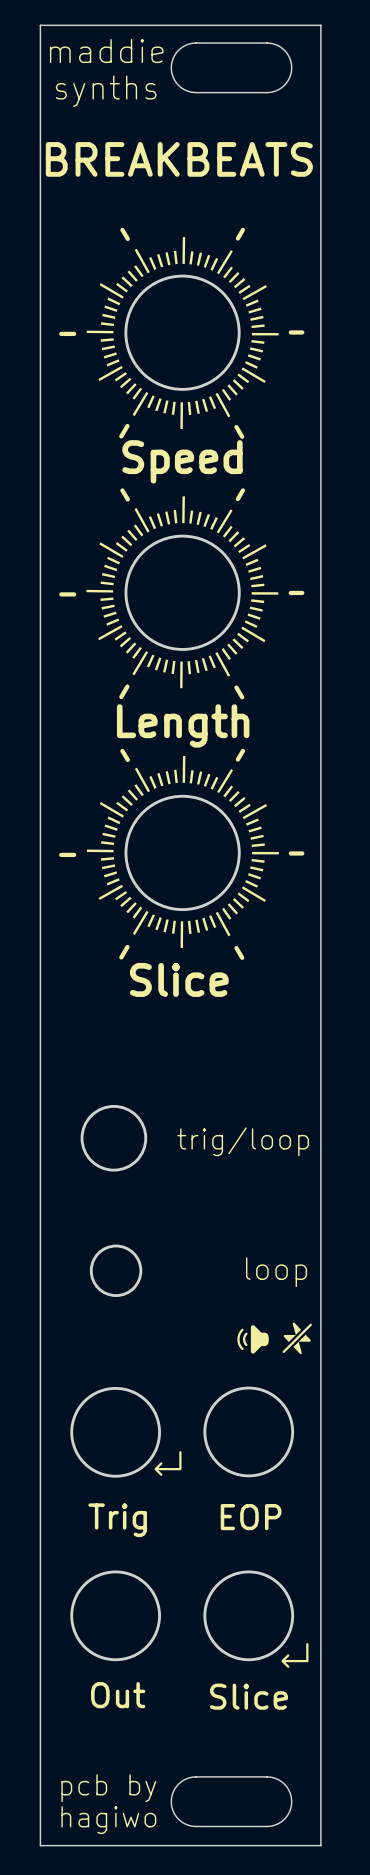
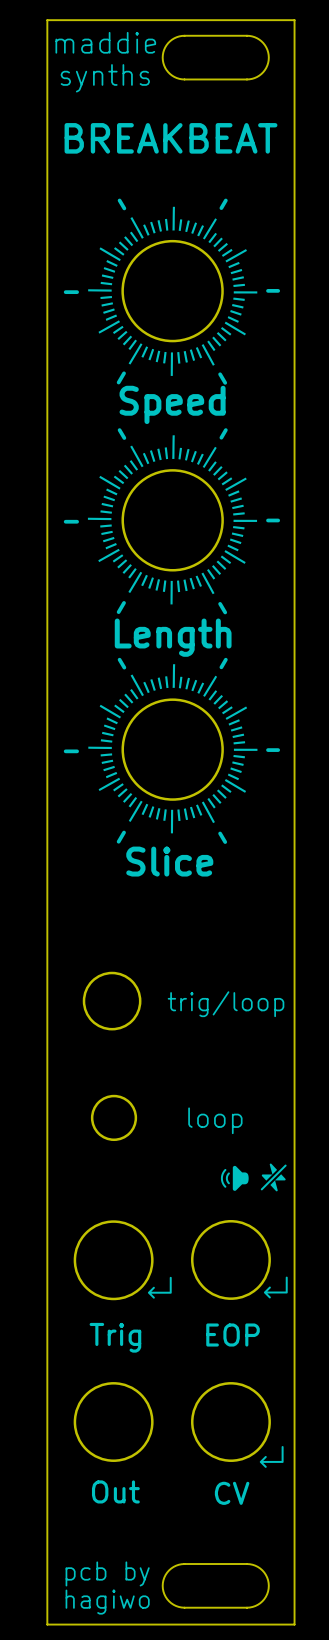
text: BREAKBEATS (179, 159) -> BREAKBEAT (171, 138)
text position: loop (276, 1272) -> loop (215, 1120)
drawing: none -> [263, 1276, 288, 1299]
text: Slice (248, 1696) -> CV (232, 1493)

